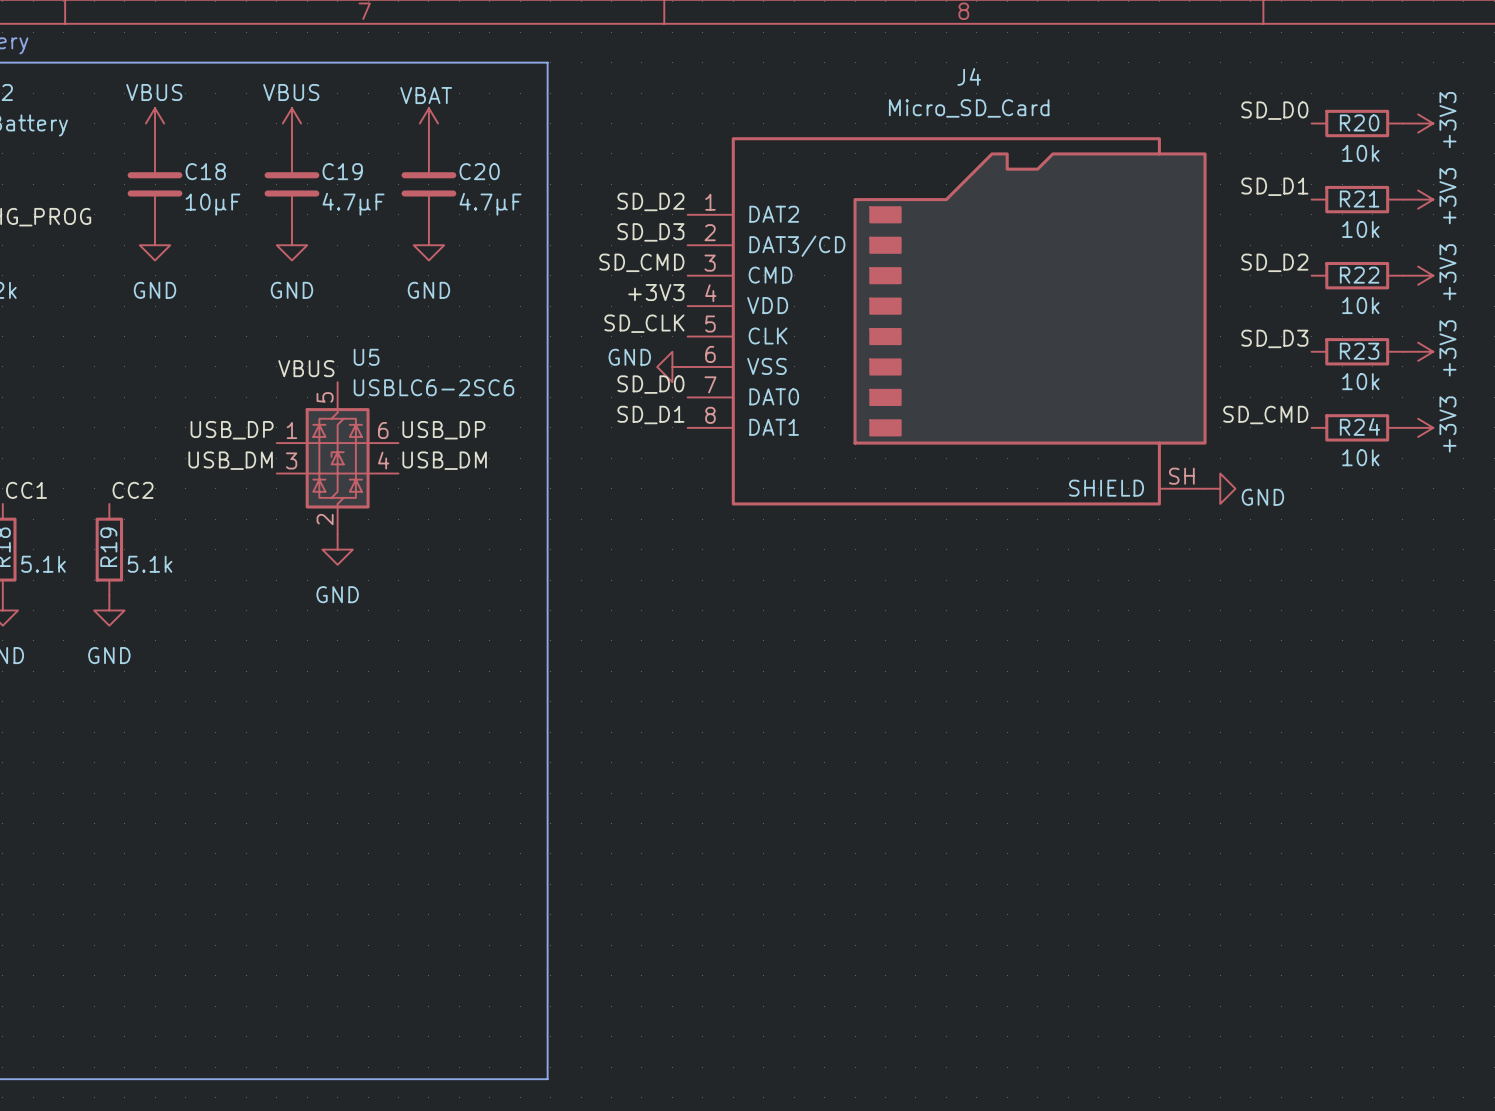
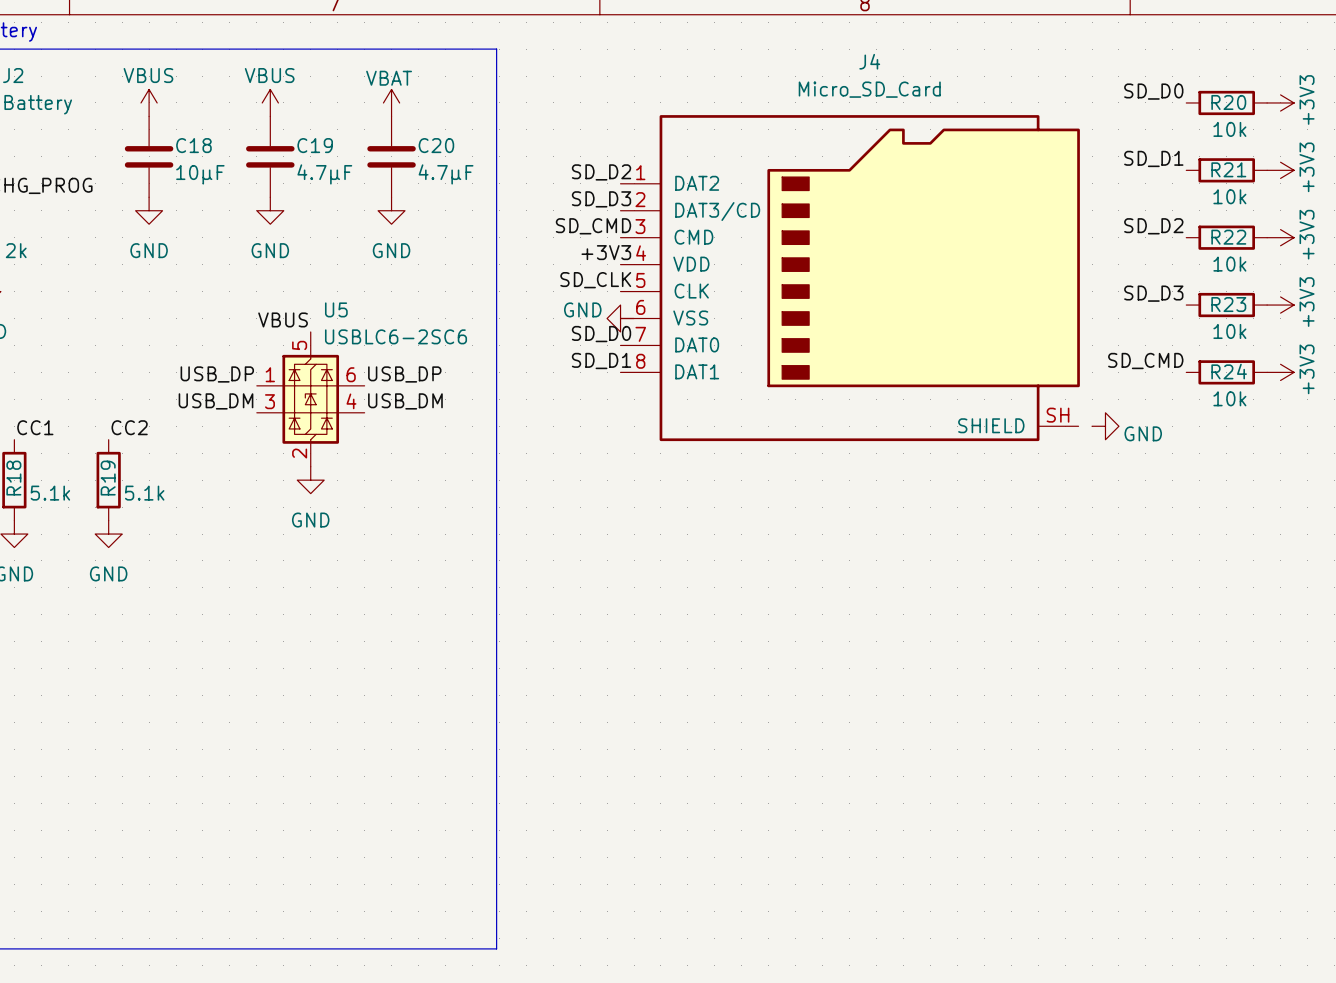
label position: SD_D0 (1274, 110) -> SD_D0 (1153, 91)
R20 position: (1357, 123) -> (1226, 102)
power symbol position: +3V3 (1418, 123) -> +3V3 (1280, 102)
label position: SD_D1 (1274, 186) -> SD_D1 (1153, 158)
R21 position: (1357, 199) -> (1226, 170)
power symbol position: +3V3 (1418, 199) -> +3V3 (1280, 170)
label position: SD_D2 (650, 201) -> SD_D2 (601, 172)
label position: SD_D3 (650, 232) -> SD_D3 (601, 199)
label position: SD_CMD (641, 262) -> SD_CMD (593, 226)
label position: SD_D2 (1274, 262) -> SD_D2 (1153, 226)
R22 position: (1357, 275) -> (1226, 237)
power symbol position: +3V3 (1418, 275) -> +3V3 (1280, 237)
label position: +3V3 (656, 292) -> +3V3 (606, 252)
label position: SD_CLK (644, 323) -> SD_CLK (595, 280)
label position: SD_D3 (1274, 338) -> SD_D3 (1153, 293)
R23 position: (1357, 351) -> (1226, 305)
power symbol position: +3V3 (1418, 351) -> +3V3 (1280, 305)
power symbol position: GND (672, 366) -> GND (620, 318)
label position: SD_D0 (650, 384) -> SD_D0 (601, 334)
label position: SD_D1 (650, 415) -> SD_D1 (601, 361)
label position: SD_CMD (1265, 415) -> SD_CMD (1145, 361)
R24 position: (1357, 427) -> (1226, 372)
power symbol position: +3V3 (1418, 427) -> +3V3 (1280, 372)
power symbol position: GND (1220, 488) -> GND (1105, 426)

